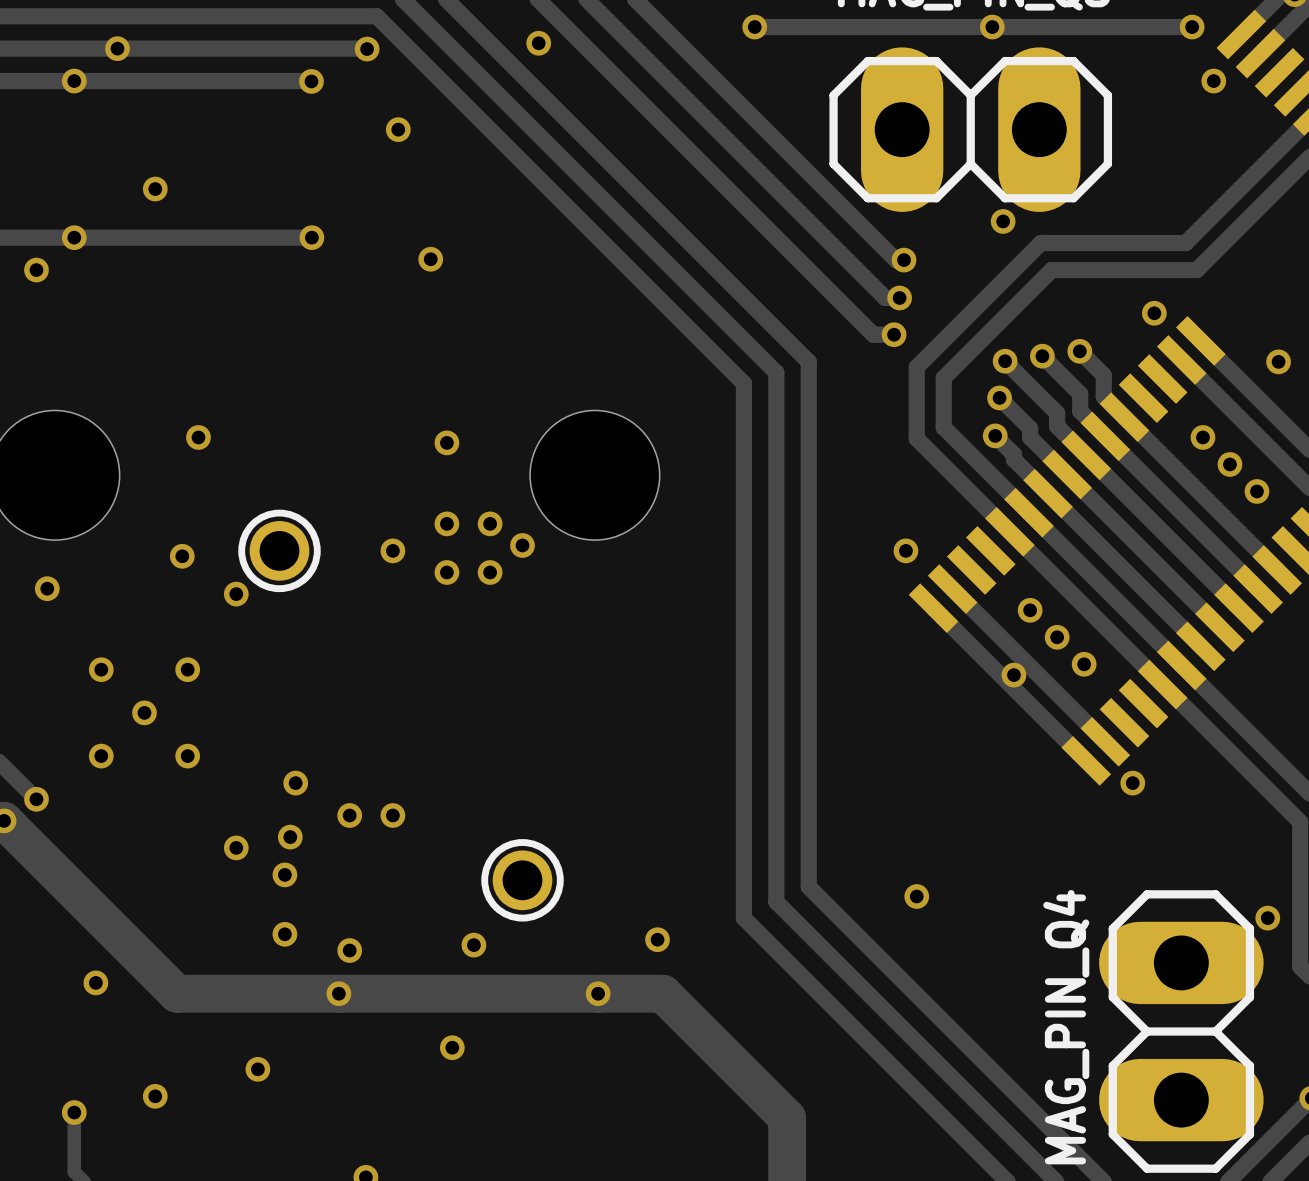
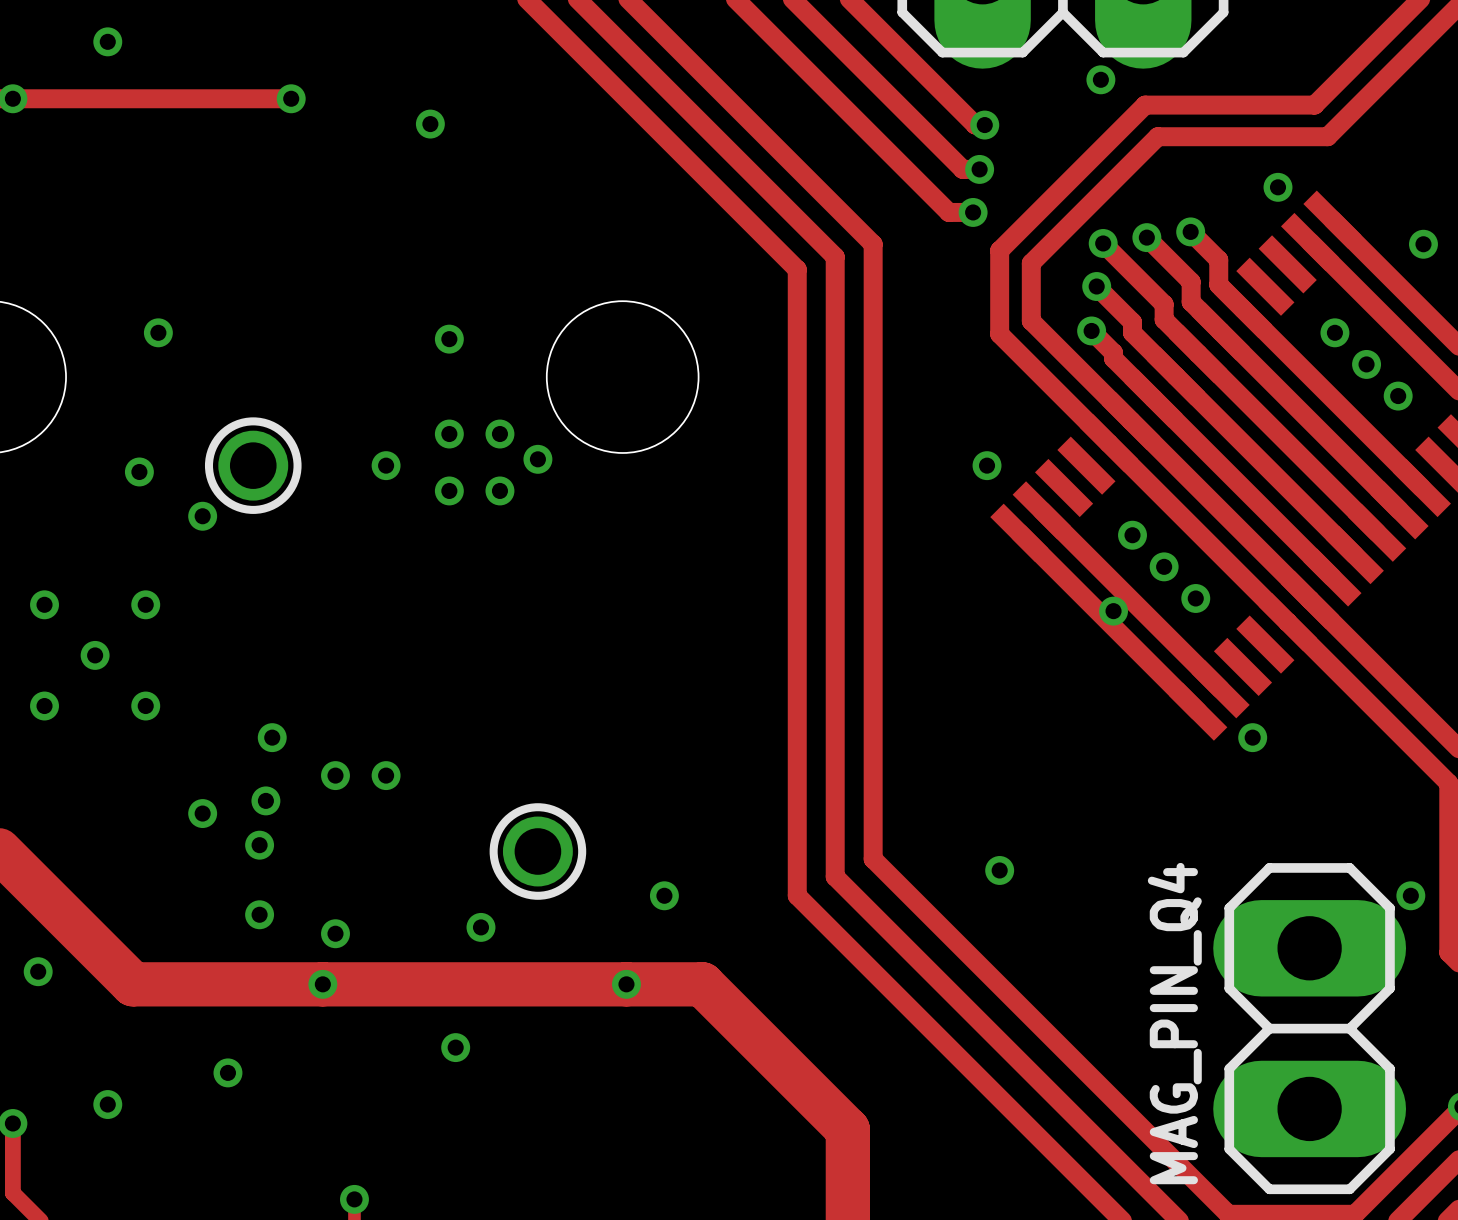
via position: (657, 939) -> (664, 895)

